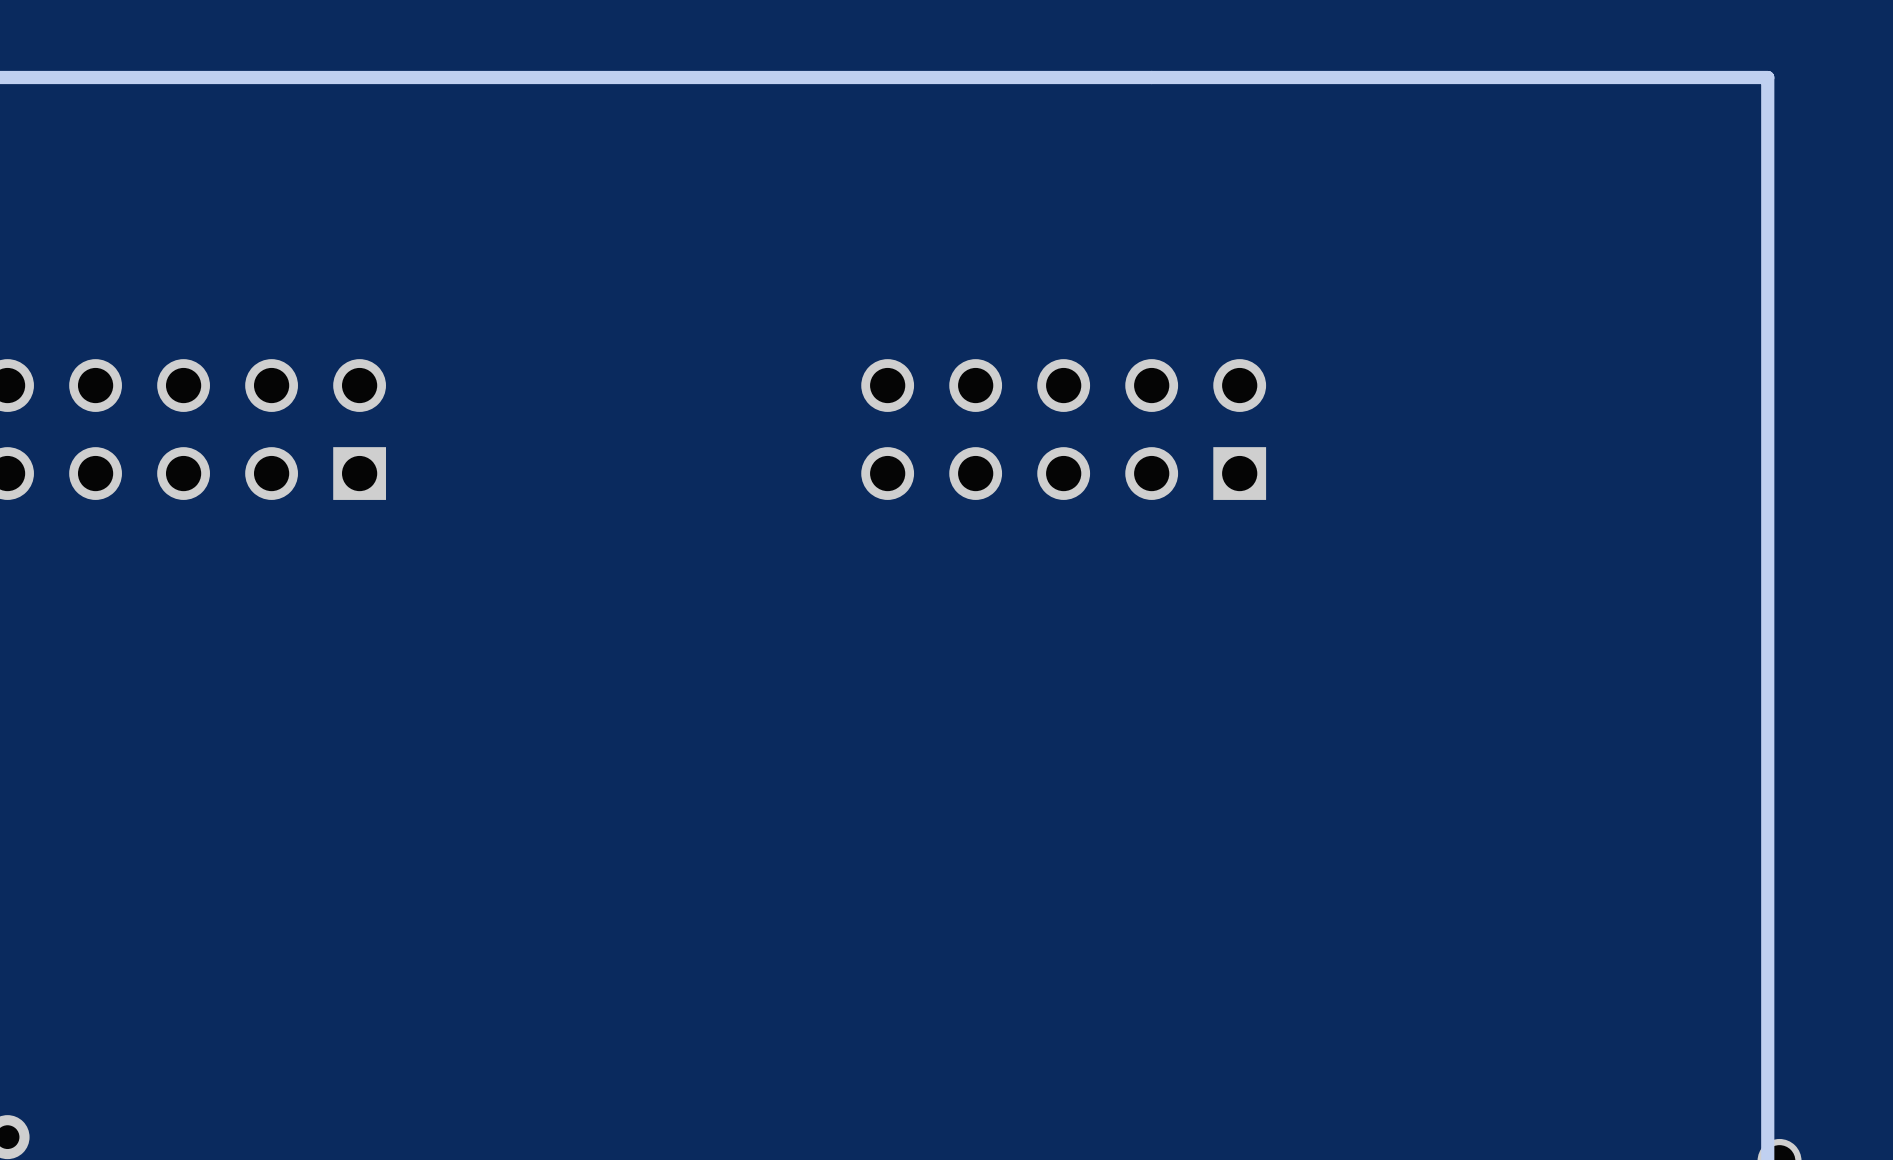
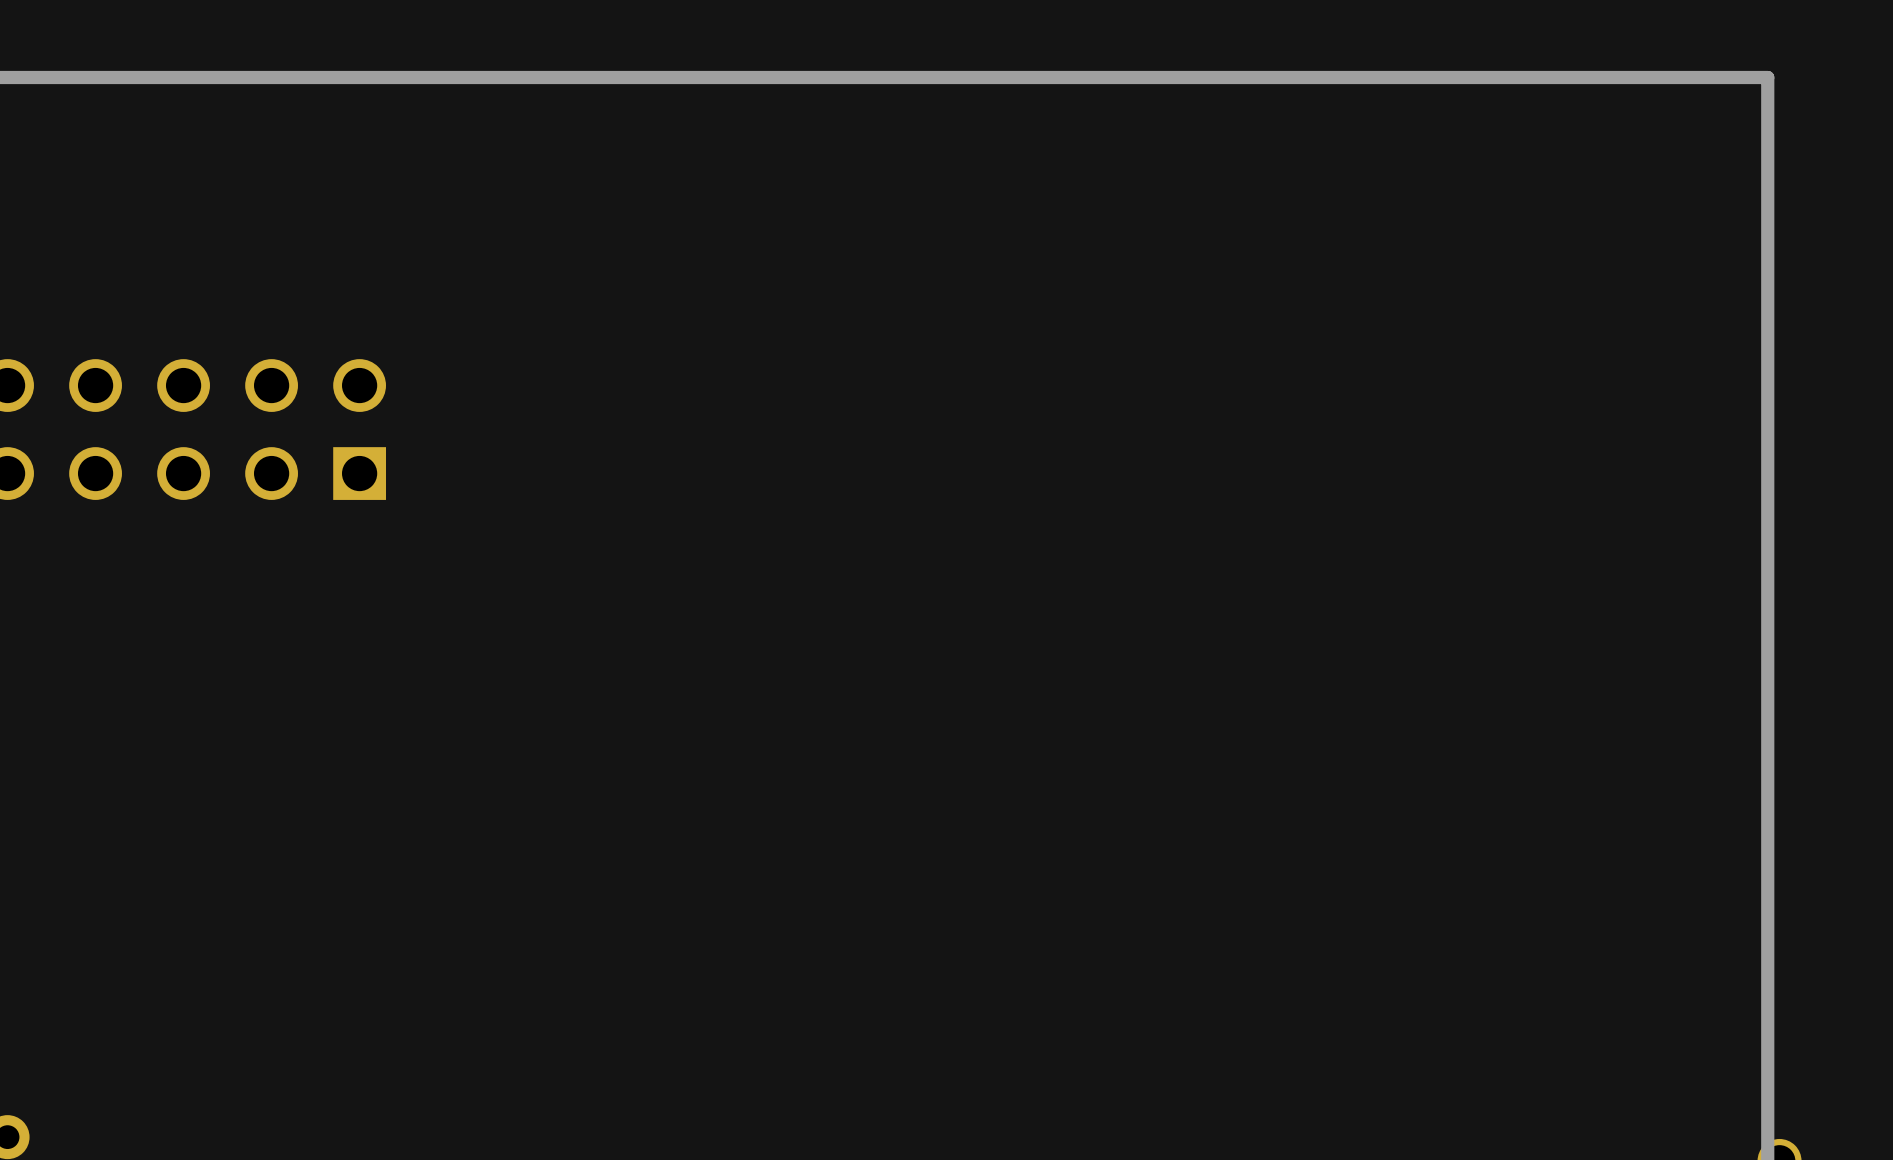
part: (1063, 429) -> none

